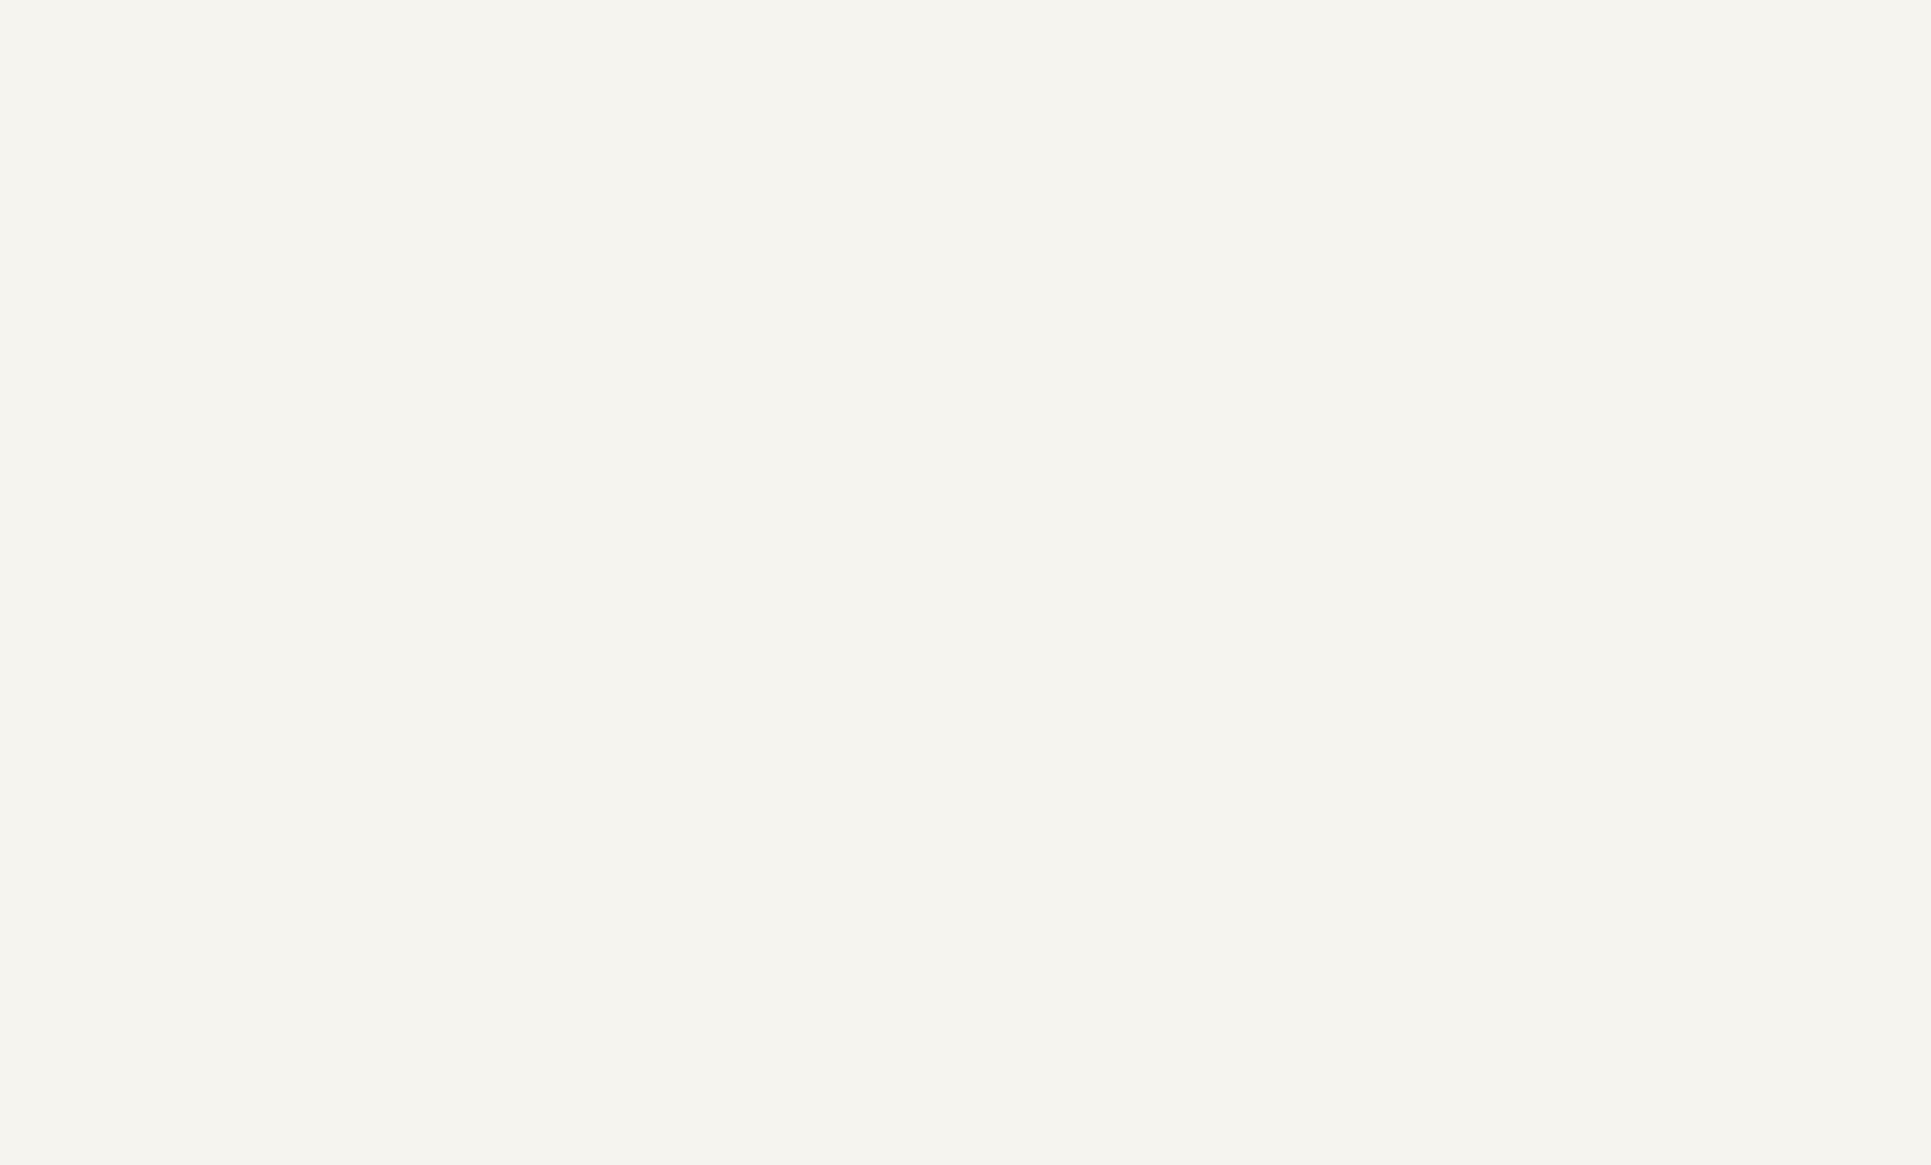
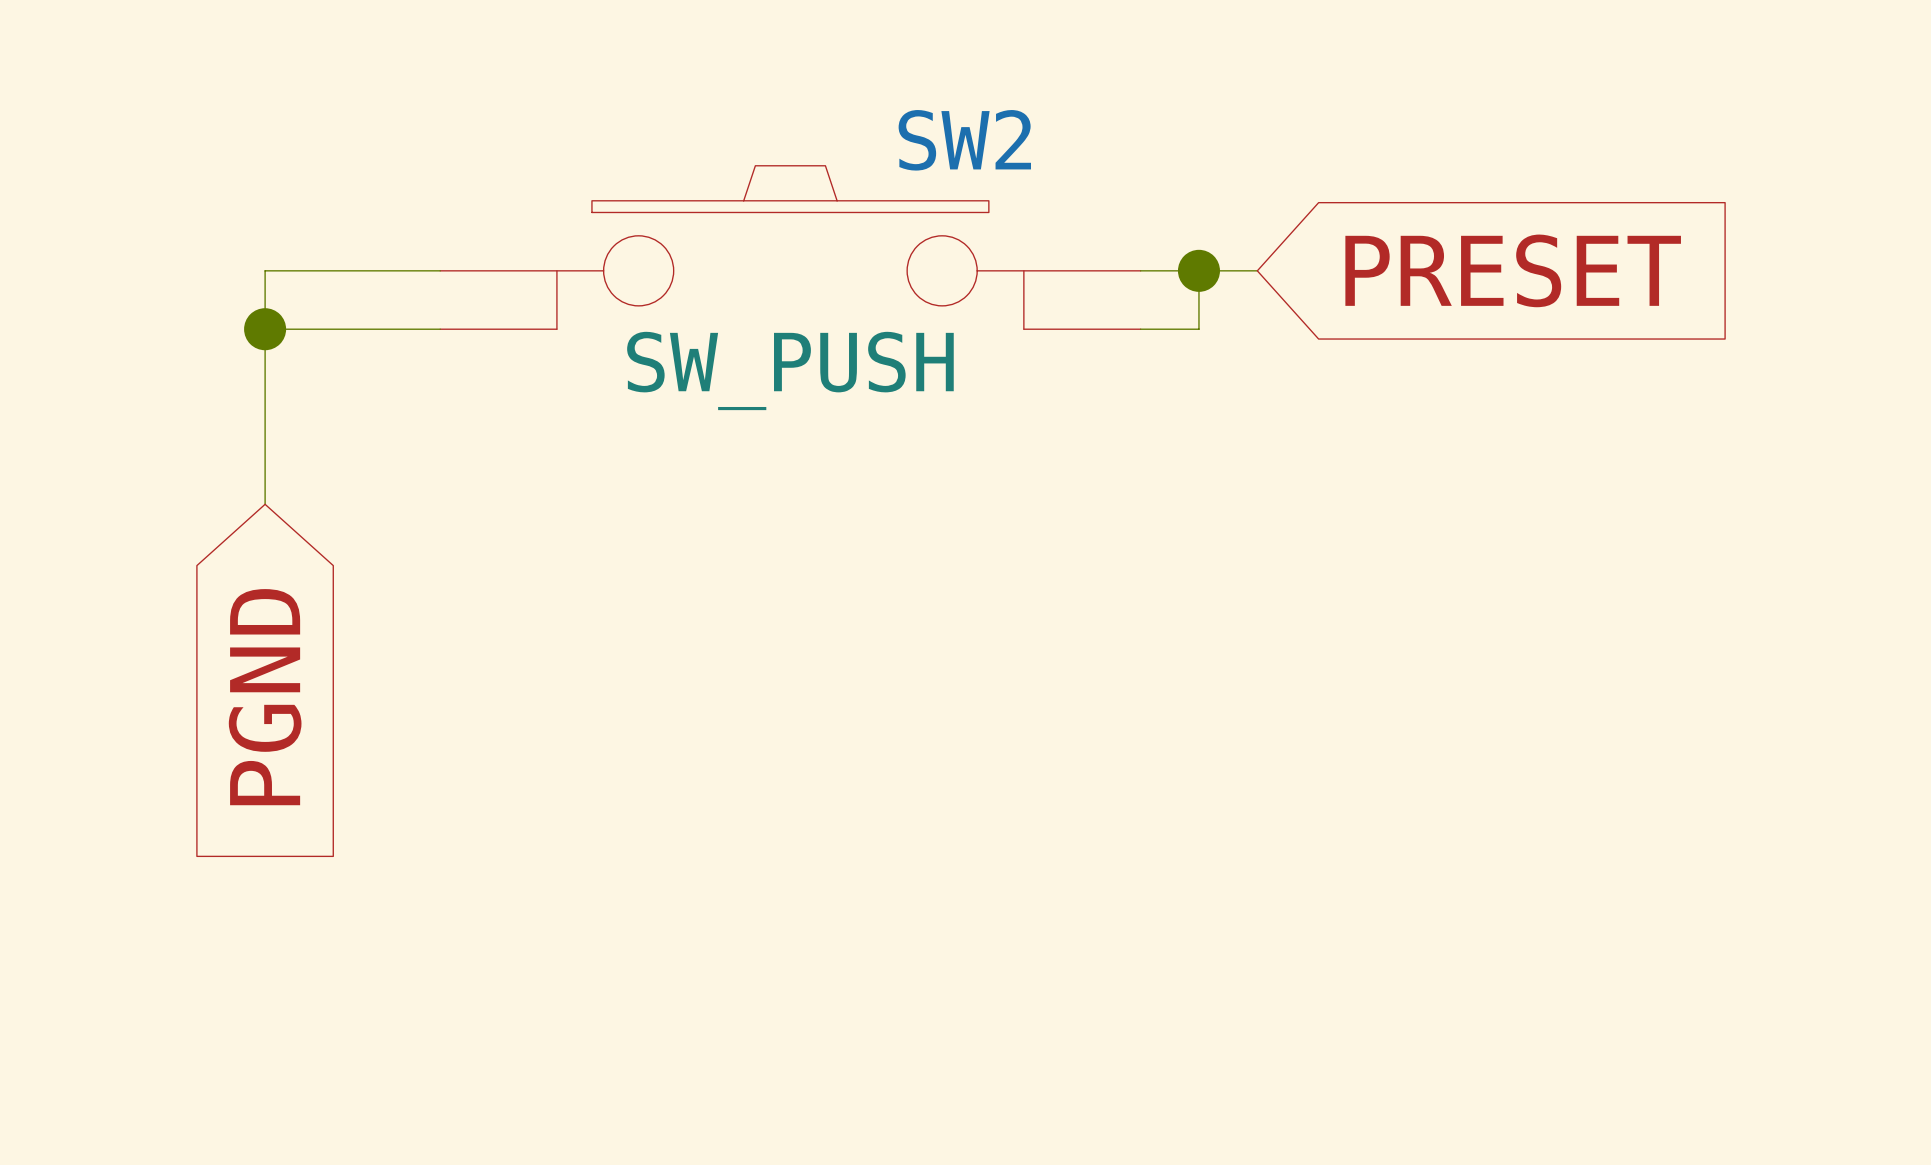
SW2: none -> SW_PUSH (790, 247)
wire: none -> (440, 270) (265, 270) (265, 504)
wire: none -> (1140, 270) (1257, 270)
wire: none -> (1198, 270) (1198, 329) (1140, 329)
junction: none -> (1198, 270)
global label: none -> PRESET (1513, 270)
wire: none -> (265, 329) (440, 329)
junction: none -> (265, 329)
global label: none -> PGND (265, 697)

